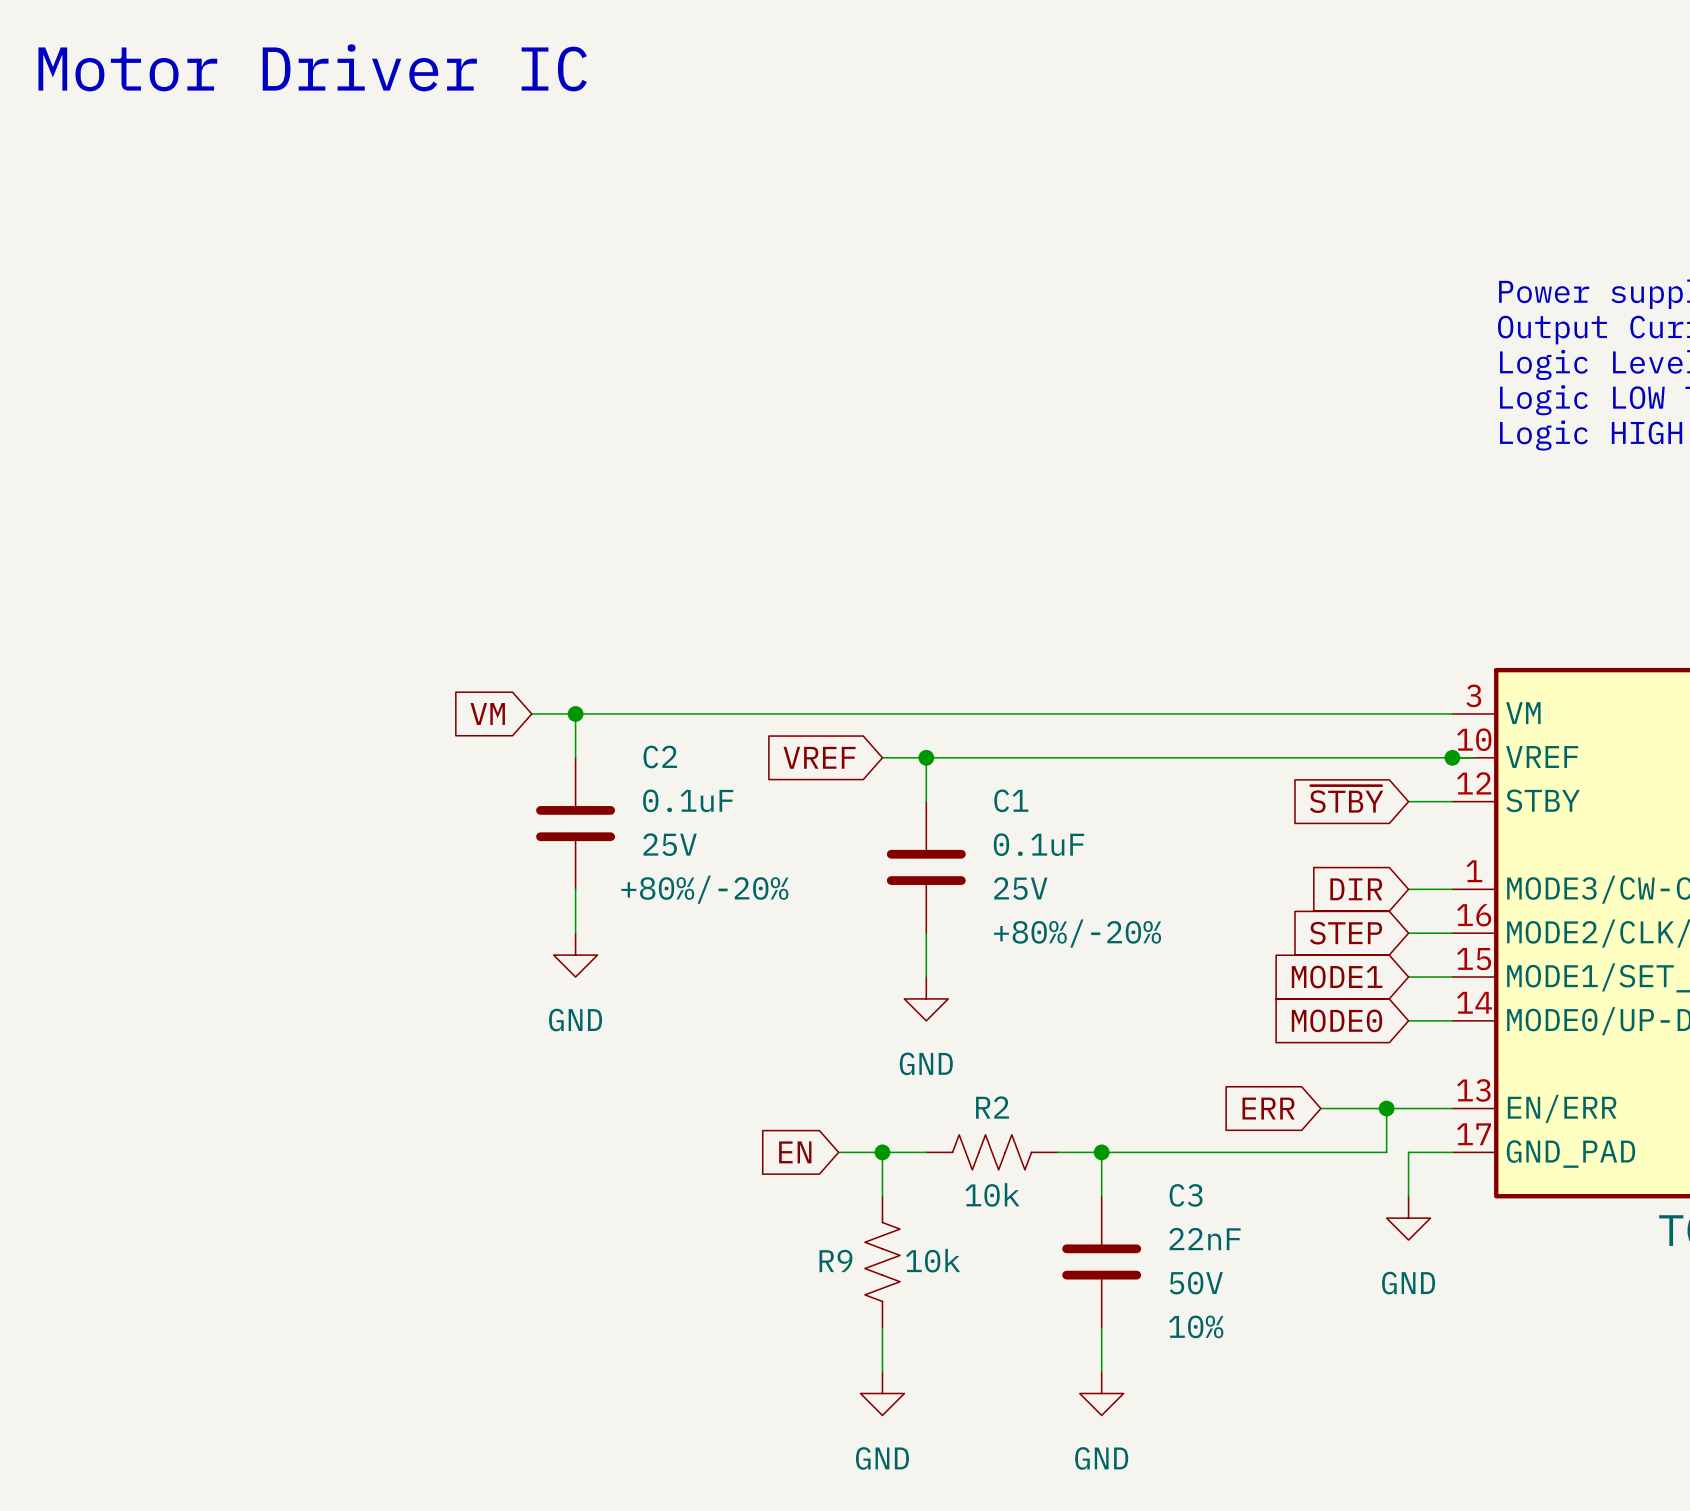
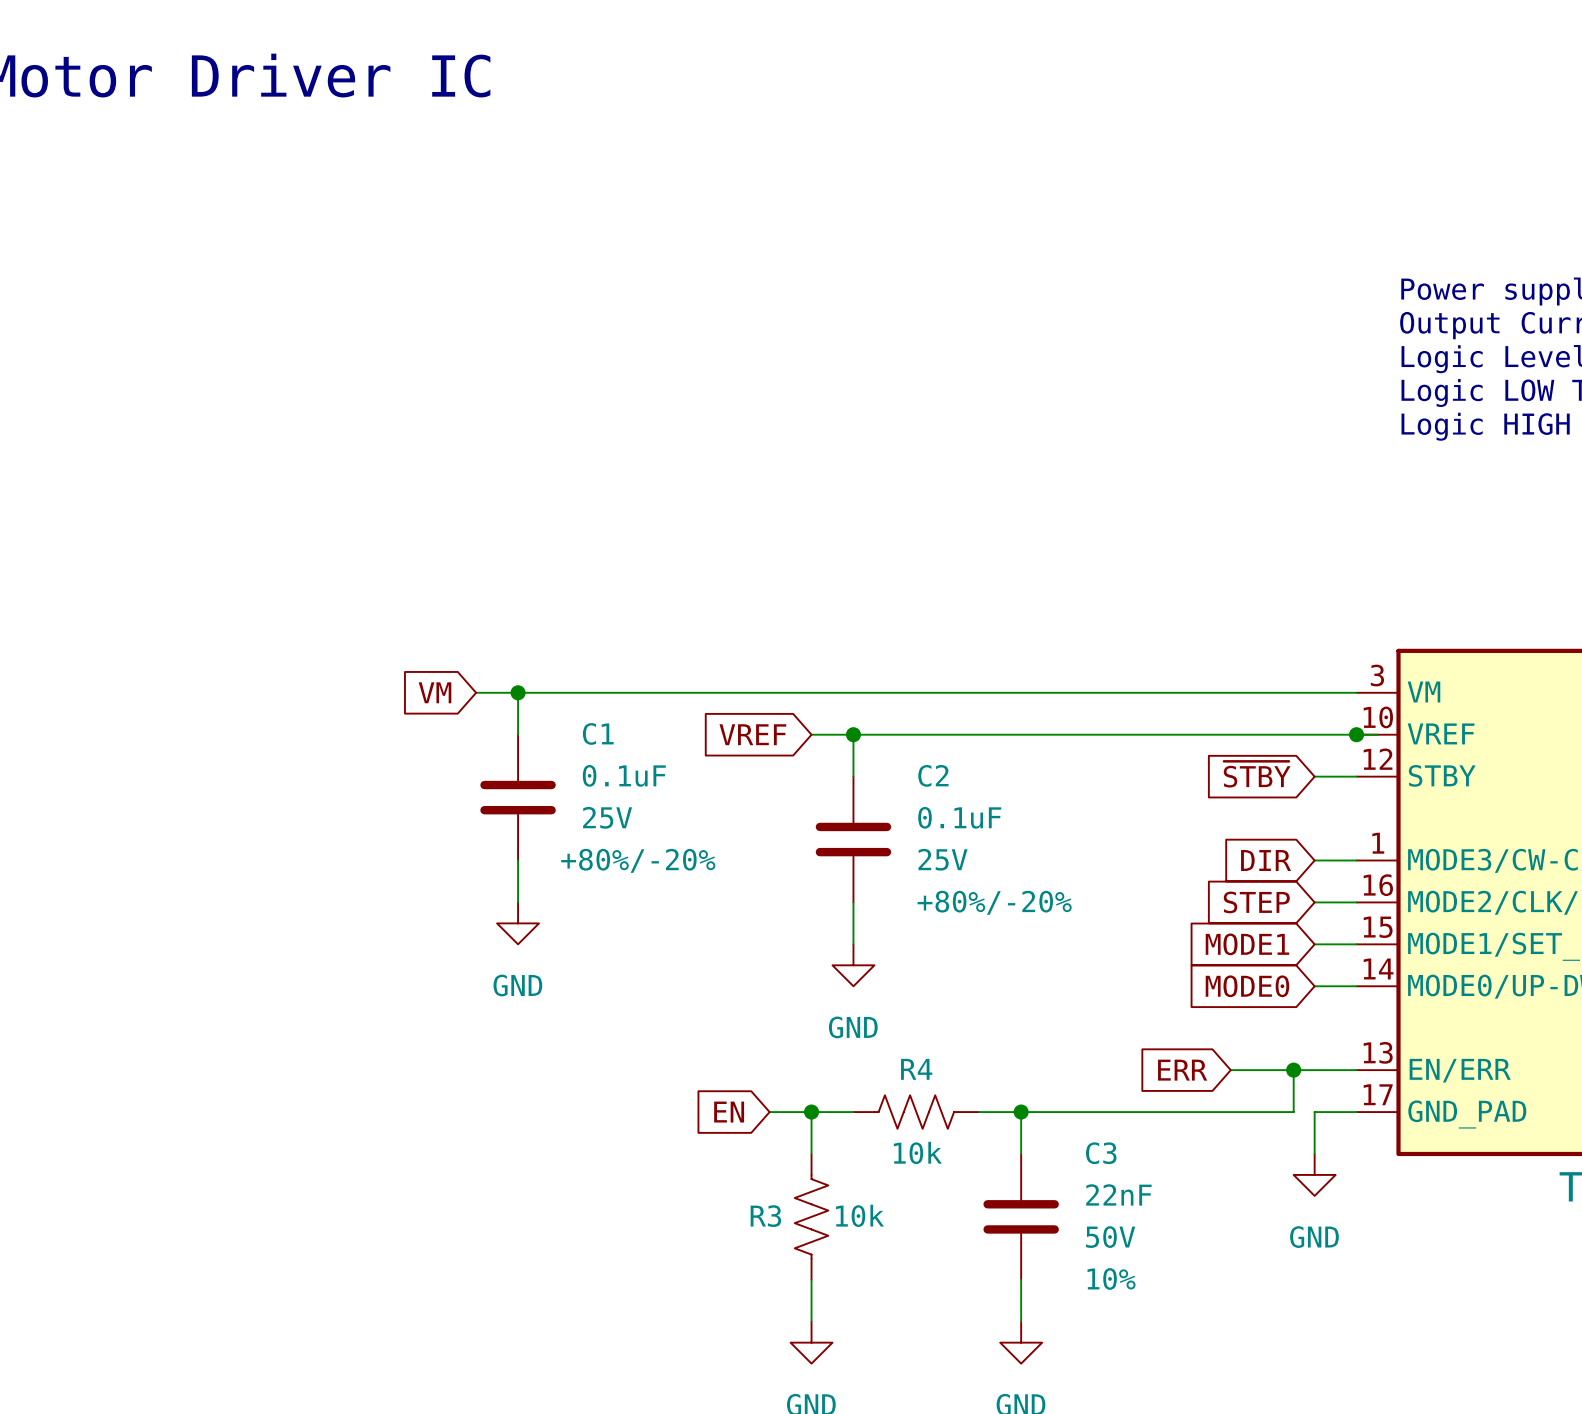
C2 name: C2 (660, 756) -> C1 (598, 733)
C1 name: C1 (1011, 800) -> C2 (933, 775)
R2 name: R2 (992, 1107) -> R4 (916, 1069)
R9 name: R9 (835, 1260) -> R3 (765, 1216)

